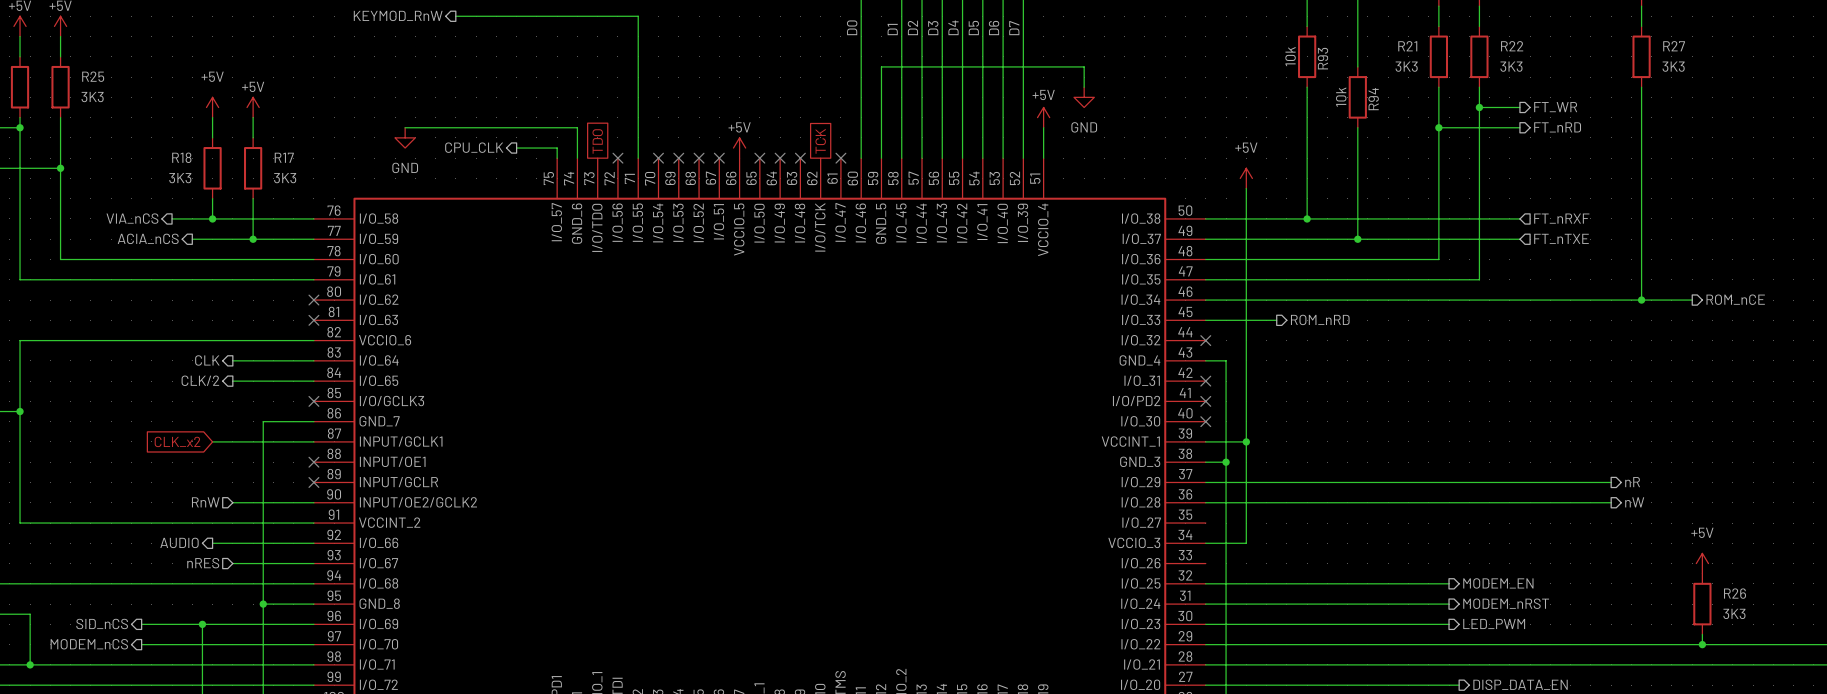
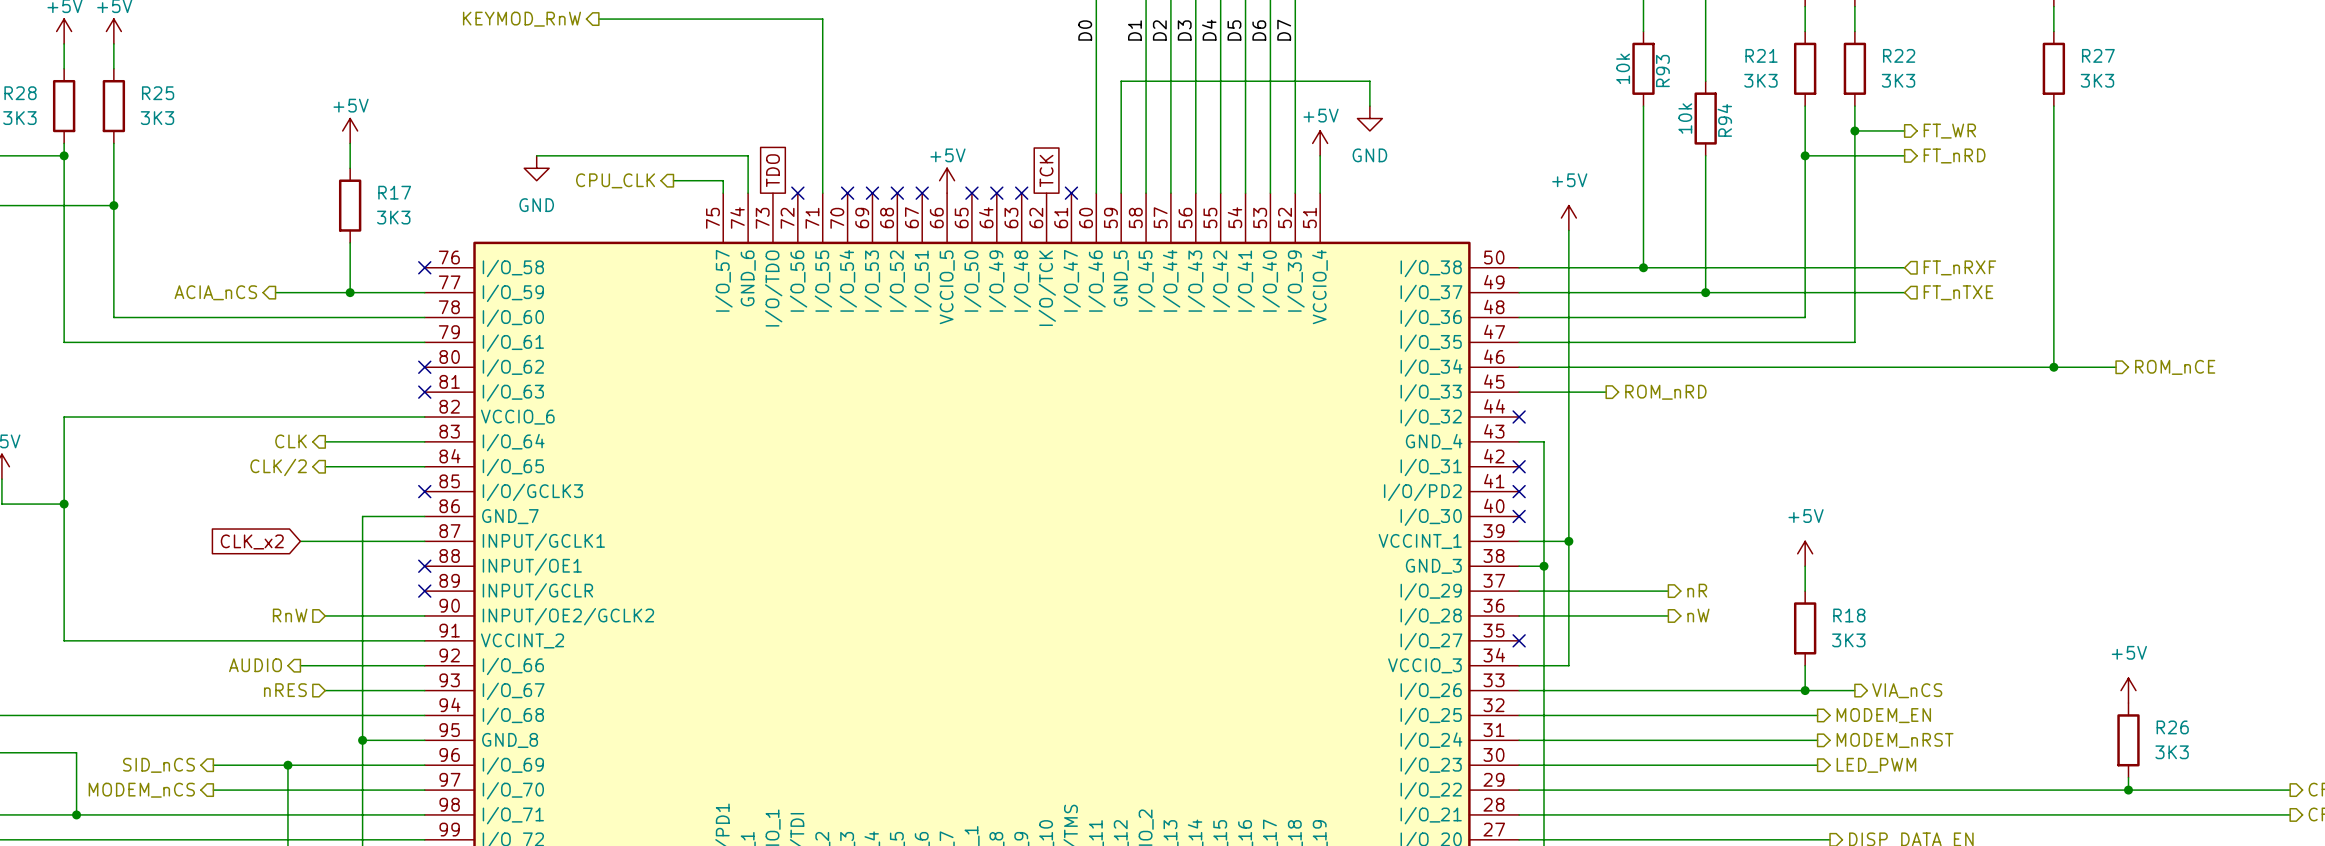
power symbol: +5V (212, 107) -> none
wire: (212, 117) (212, 137) -> none
R18 name position: R18 (181, 157) -> R18 (1849, 615)
R18 position: (212, 168) -> (1805, 628)
R18 value position: 3K3 (180, 178) -> 3K3 (1848, 640)
wire: (212, 198) (212, 218) -> none
hierarchical label: VIA_nCS (132, 218) -> none
wire: (172, 218) (313, 218) -> none
junction: (212, 218) -> none
no-connect mark: none -> (424, 267)
power symbol: none -> +5V (1805, 553)
wire: none -> (1805, 566) (1805, 591)
wire: (1327, 482) (1611, 482) -> none
hierarchical label: none -> nR (1697, 590)
hierarchical label: nR (1632, 482) -> none
wire: (1327, 502) (1611, 502) -> none
hierarchical label: none -> nW (1698, 615)
hierarchical label: nW (1634, 502) -> none
no-connect mark: none -> (1519, 640)
wire: none -> (1805, 665) (1805, 690)
wire: none -> (1519, 690) (1854, 690)
junction: none -> (1805, 690)
hierarchical label: none -> VIA_nCS (1907, 690)

